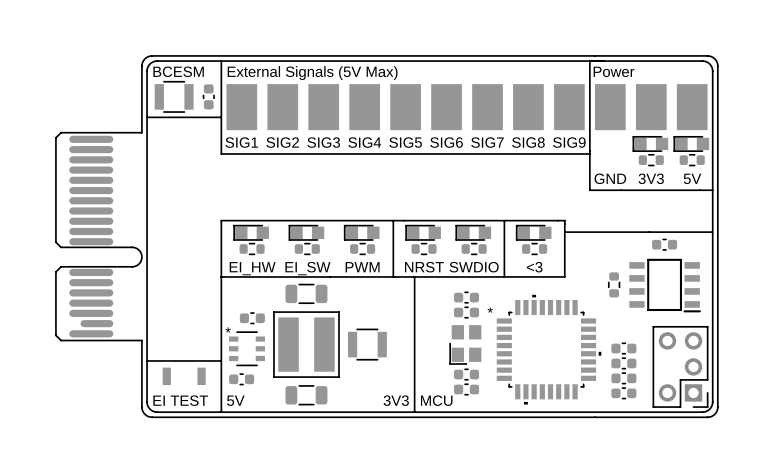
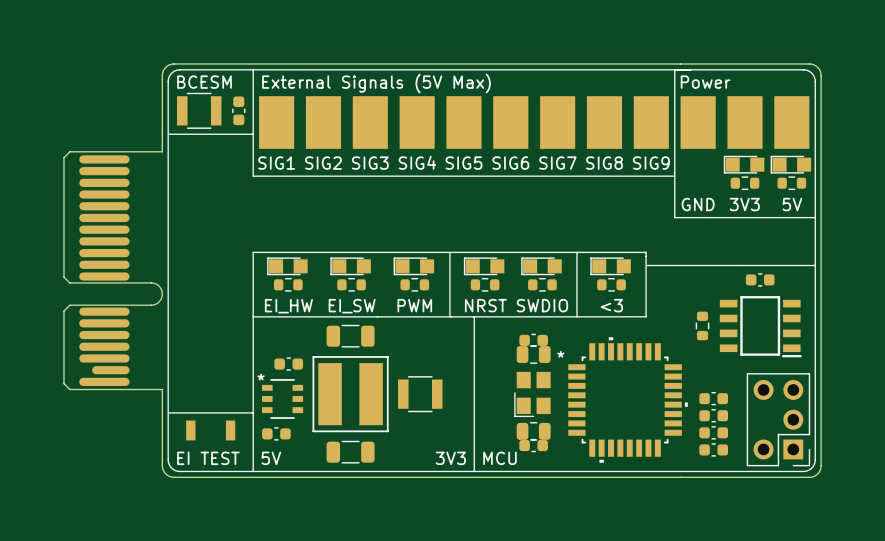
part footprint: [453, 306, 480, 319] -> [516, 345, 551, 364]
part footprint: [453, 368, 480, 381] -> [516, 422, 551, 441]

